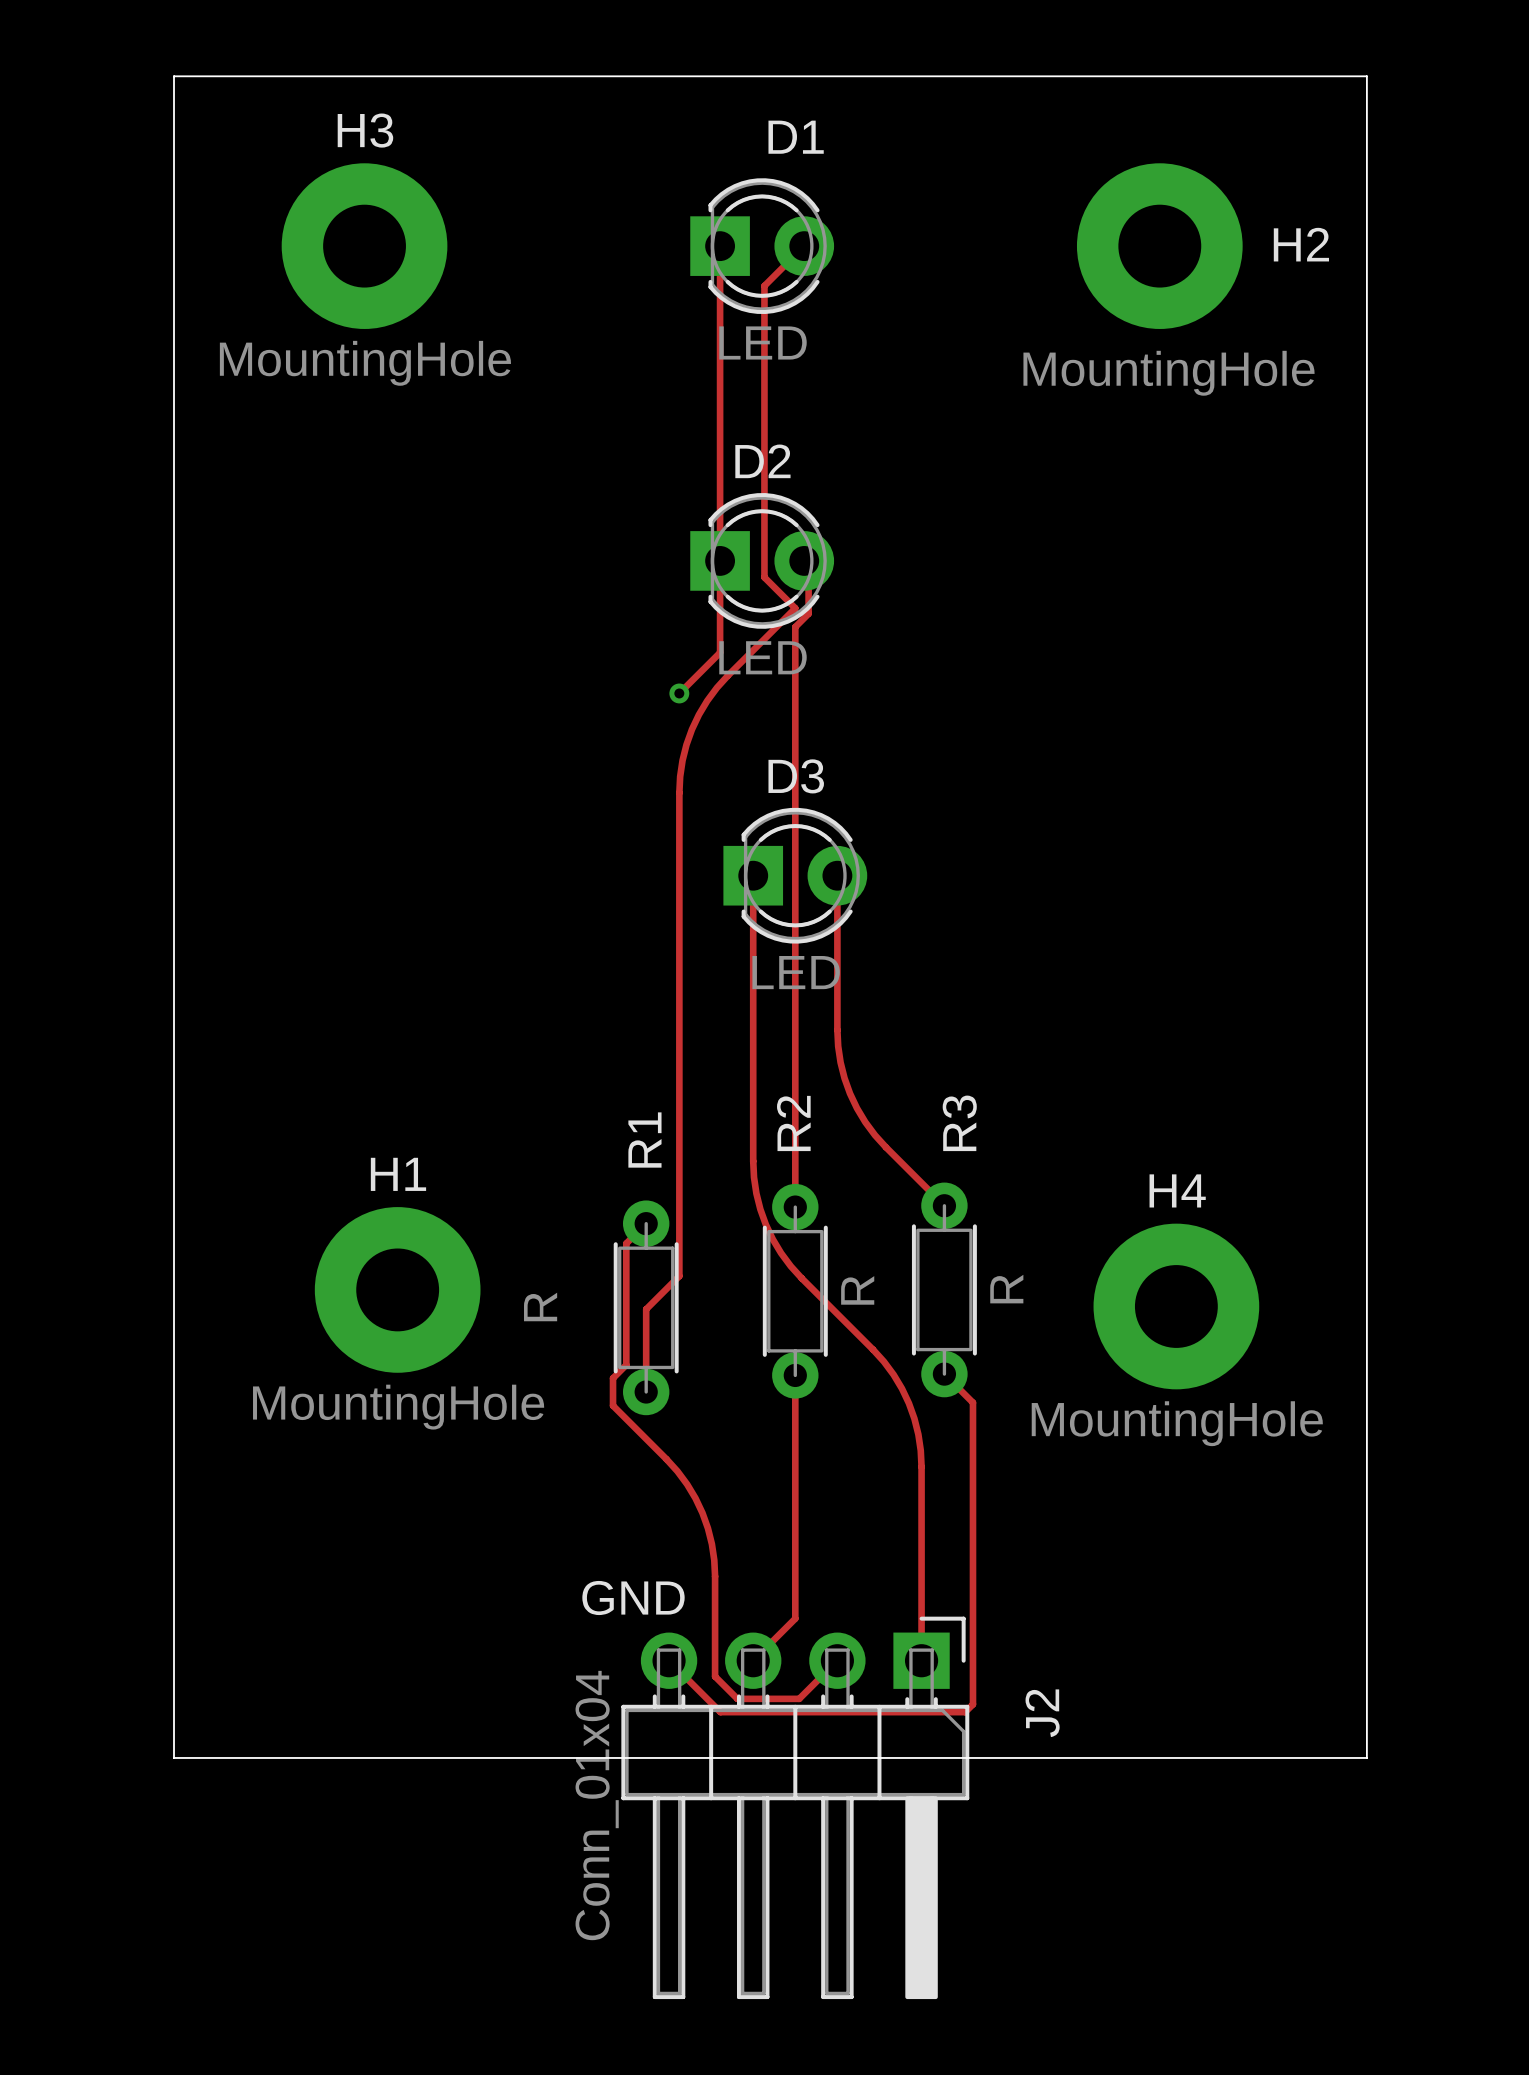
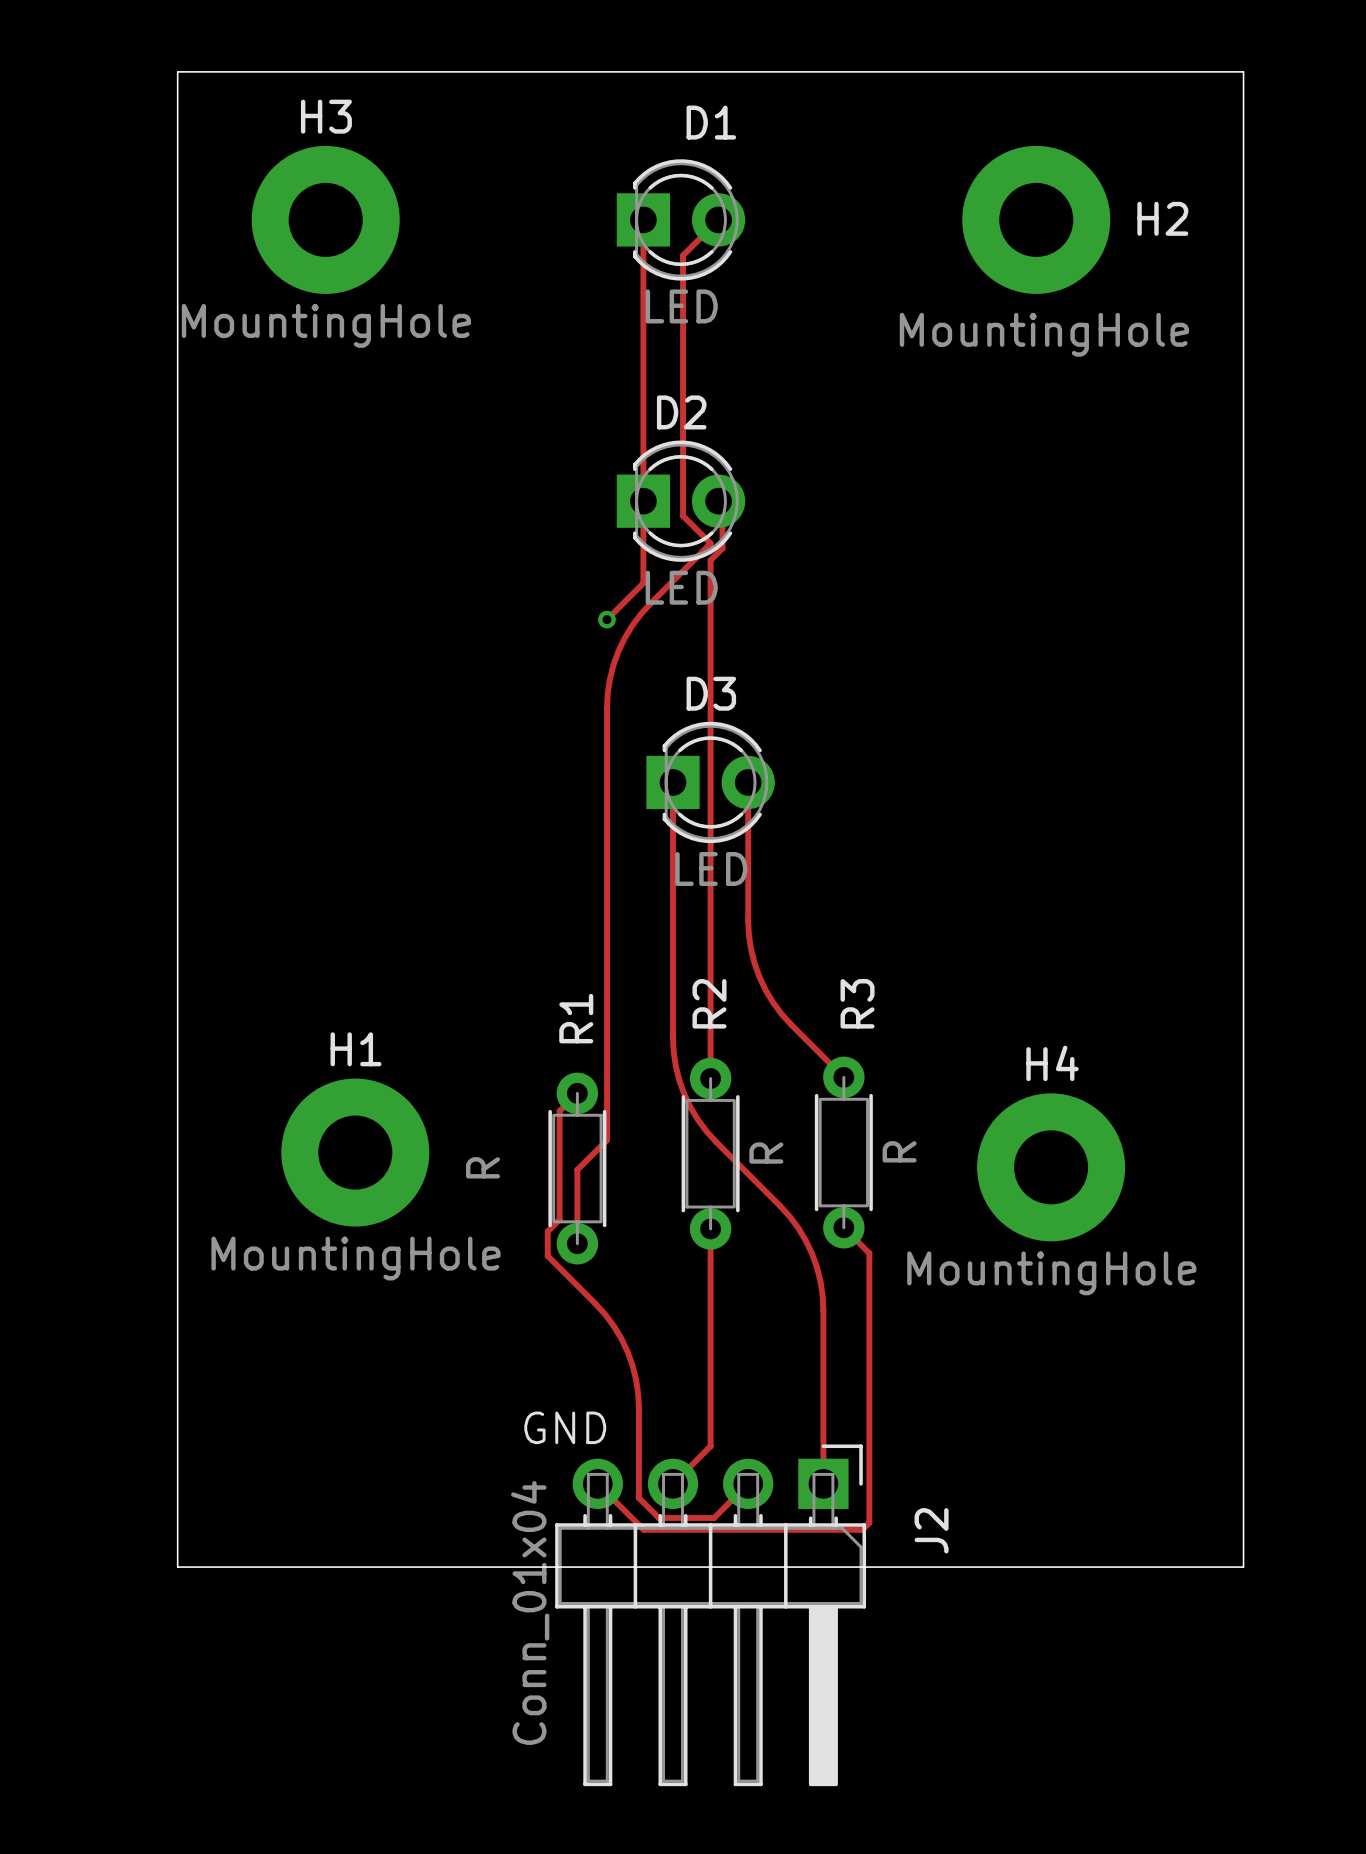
board edge: (174, 76) (1366, 76) (1366, 1757) (174, 1757) (174, 76) -> (177, 71) (177, 1567) (1243, 1567) (1243, 71) (177, 71)

